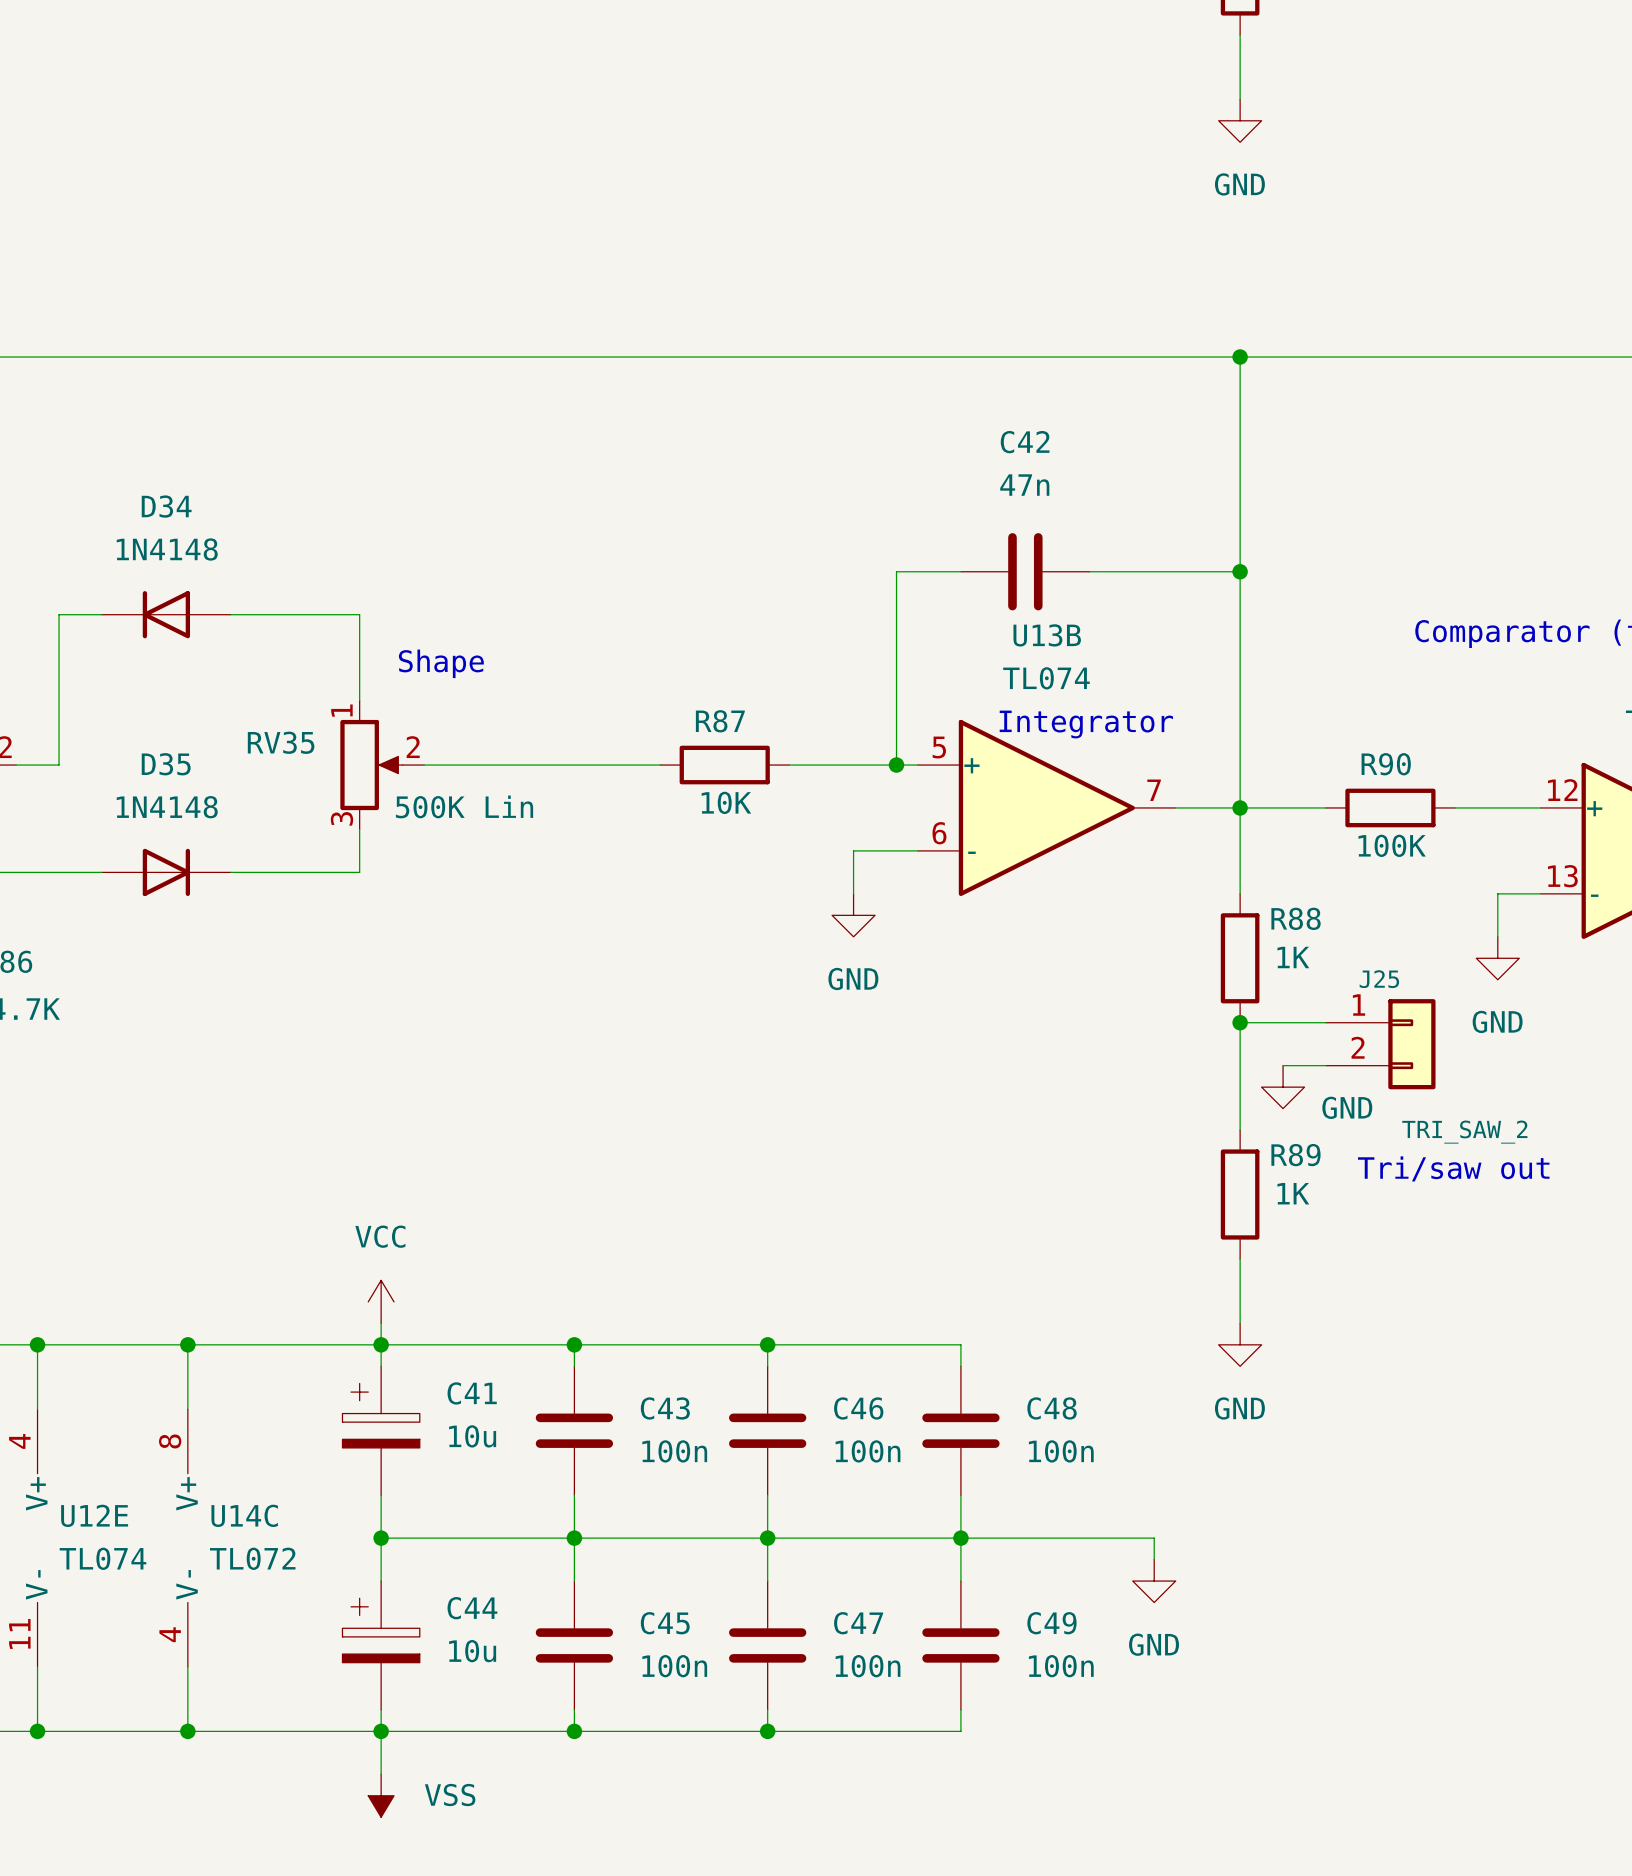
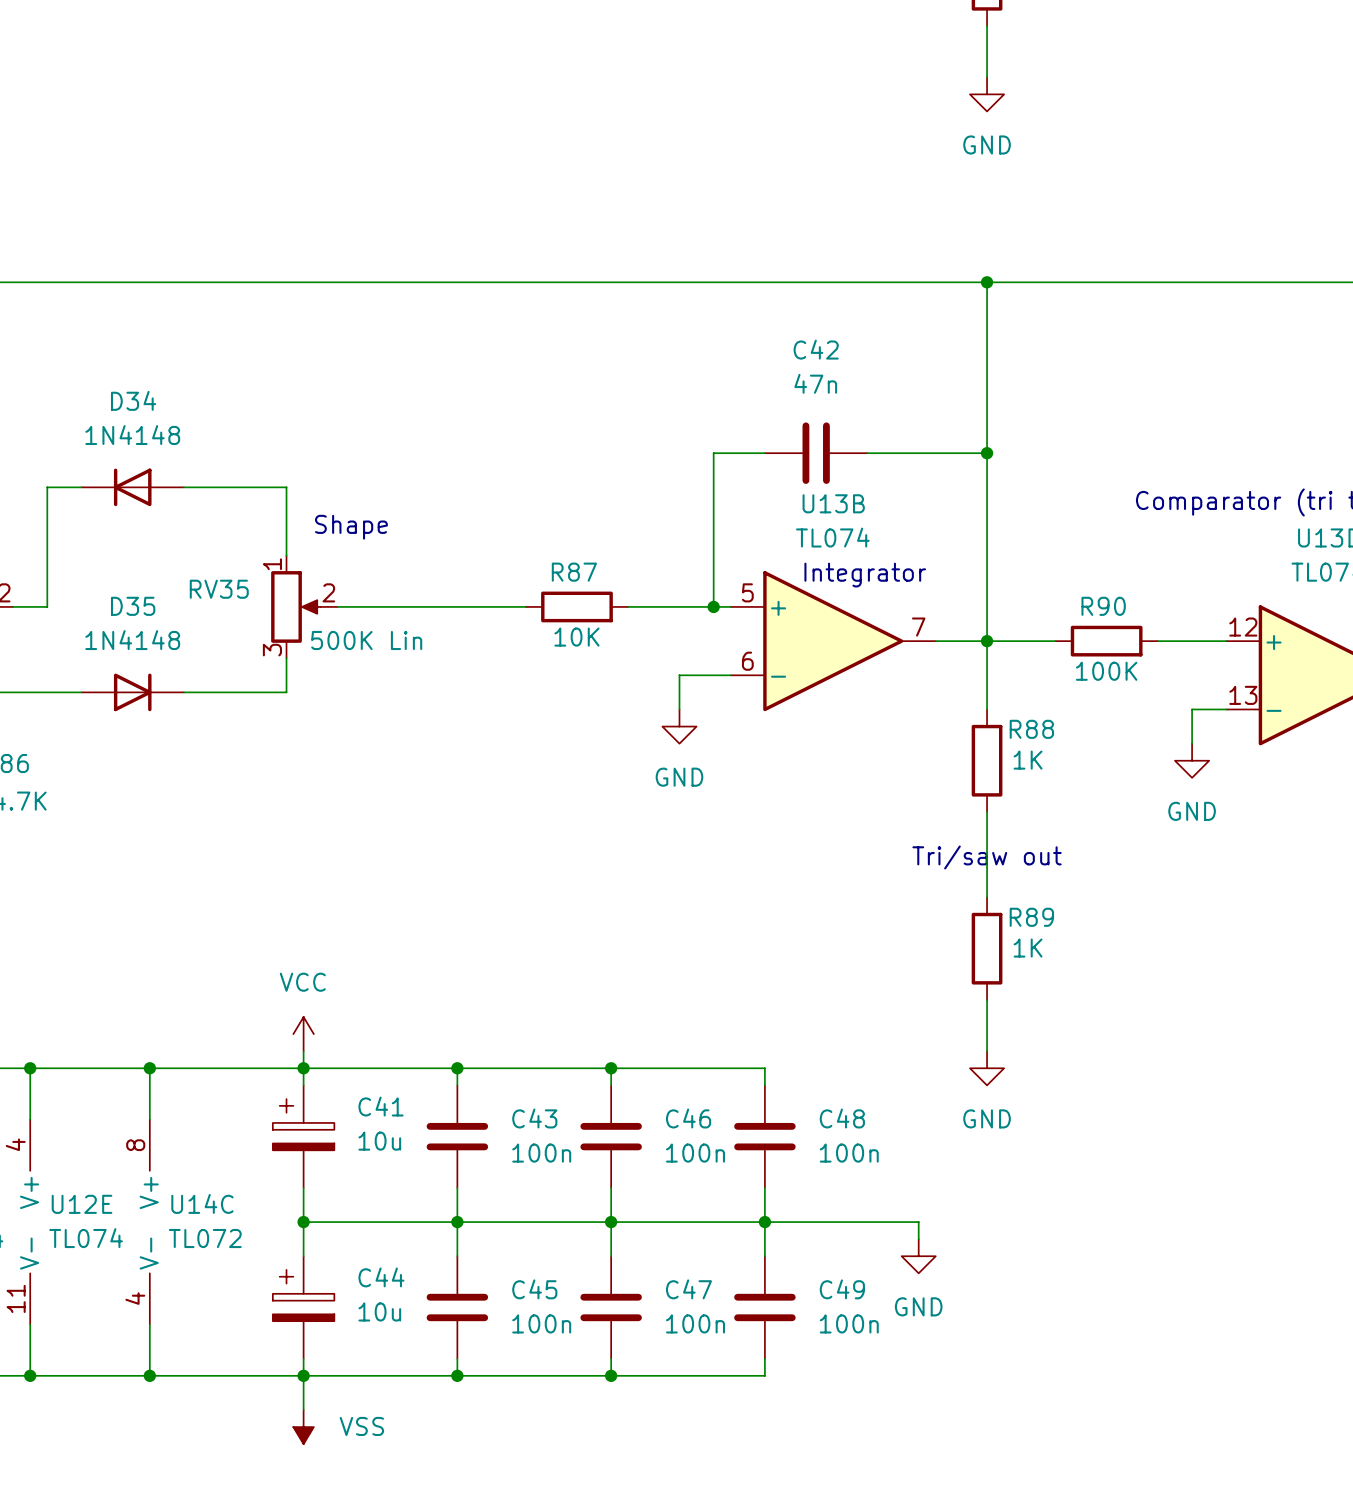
wire: (1240, 1022) (1326, 1022) -> none
junction: (1240, 1022) -> none
J25: TRI_SAW_2 (1380, 1044) -> none
wire: (1283, 1065) (1326, 1065) -> none
power symbol: GND (1283, 1087) -> none
text position: Tri/saw out (1453, 1168) -> Tri/saw out (987, 857)

